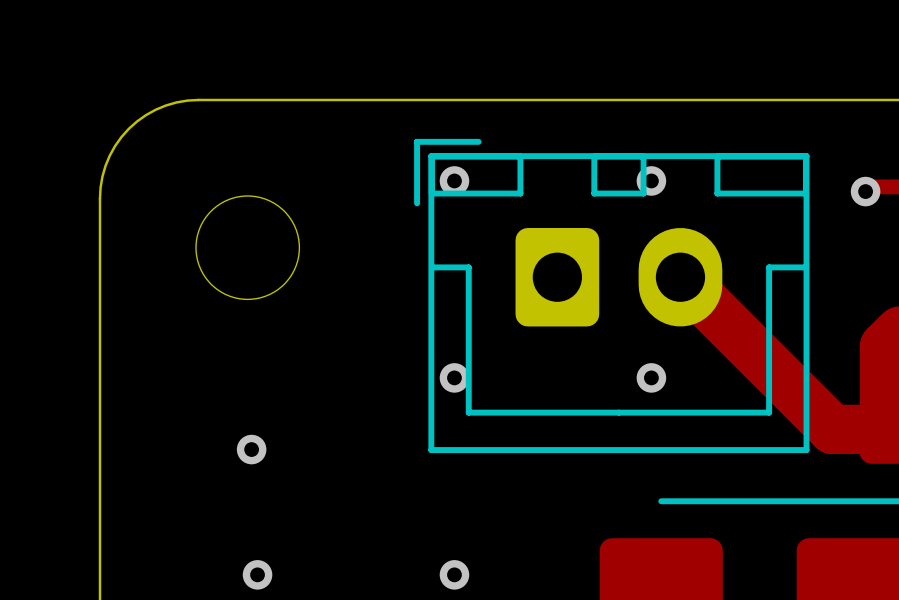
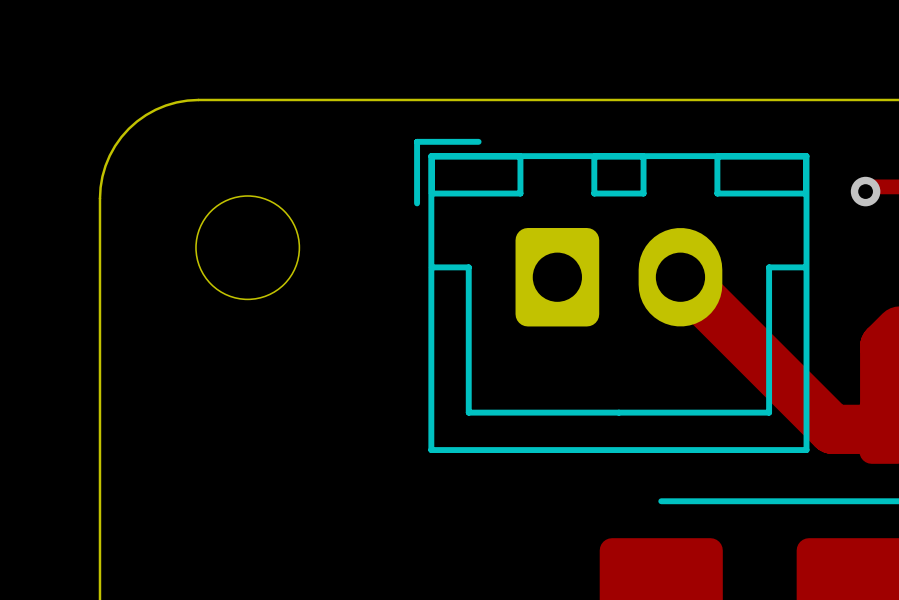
via: (454, 180) -> none
via: (651, 180) -> none
via: (454, 377) -> none
via: (651, 377) -> none
via: (251, 449) -> none
via: (257, 574) -> none
via: (454, 574) -> none

